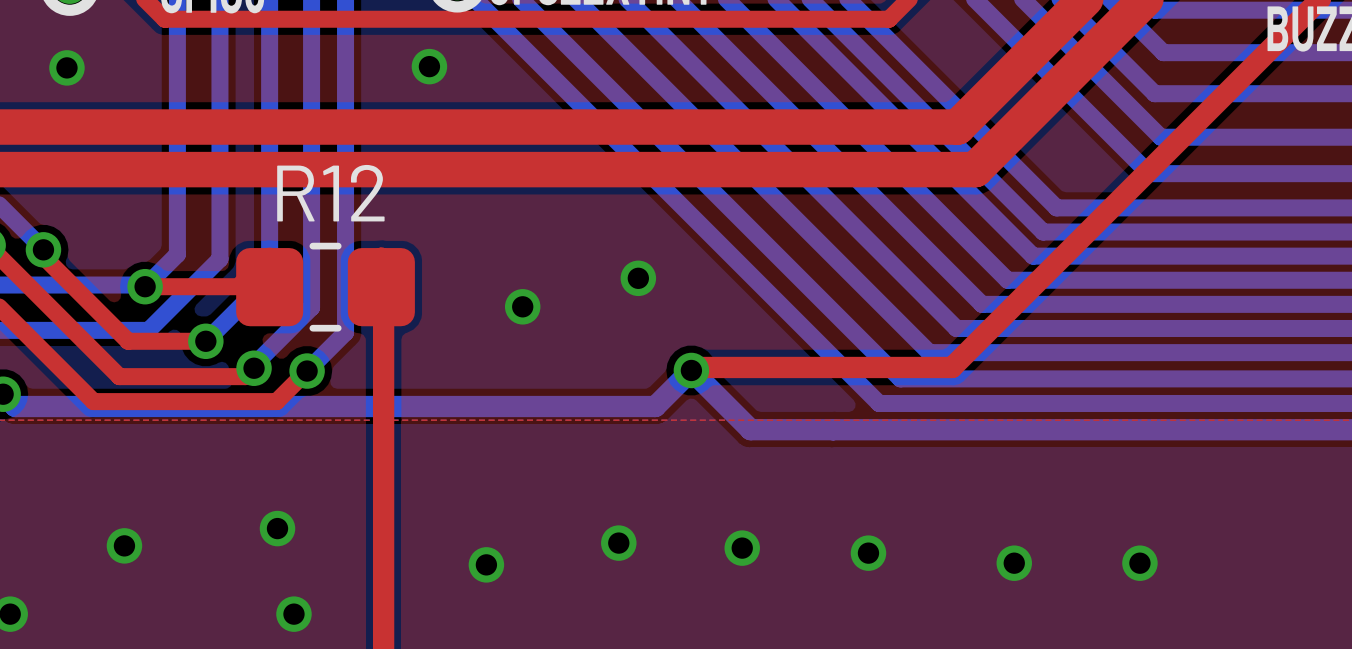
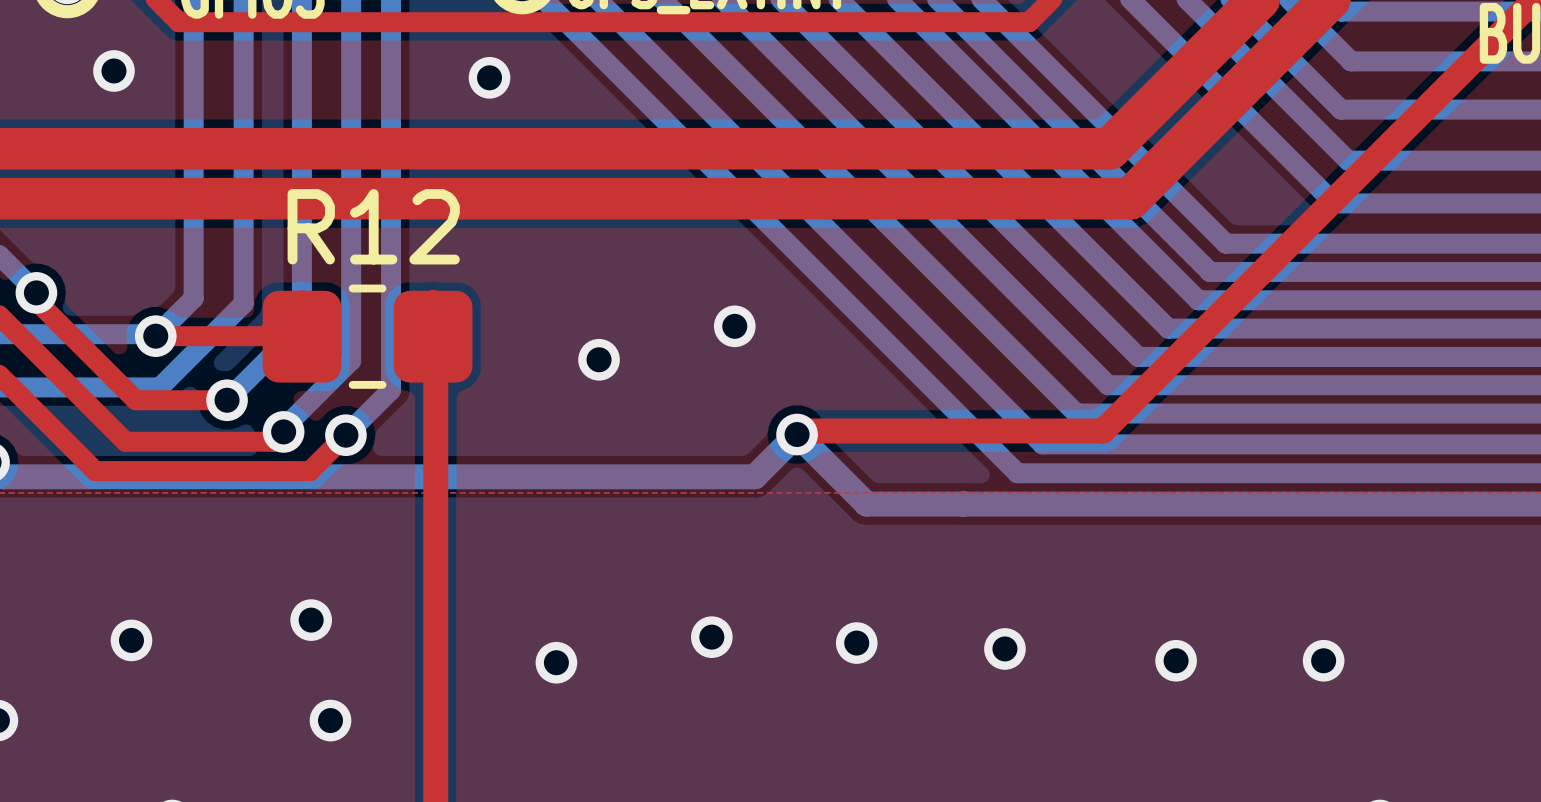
via position: (66, 67) -> (113, 70)

